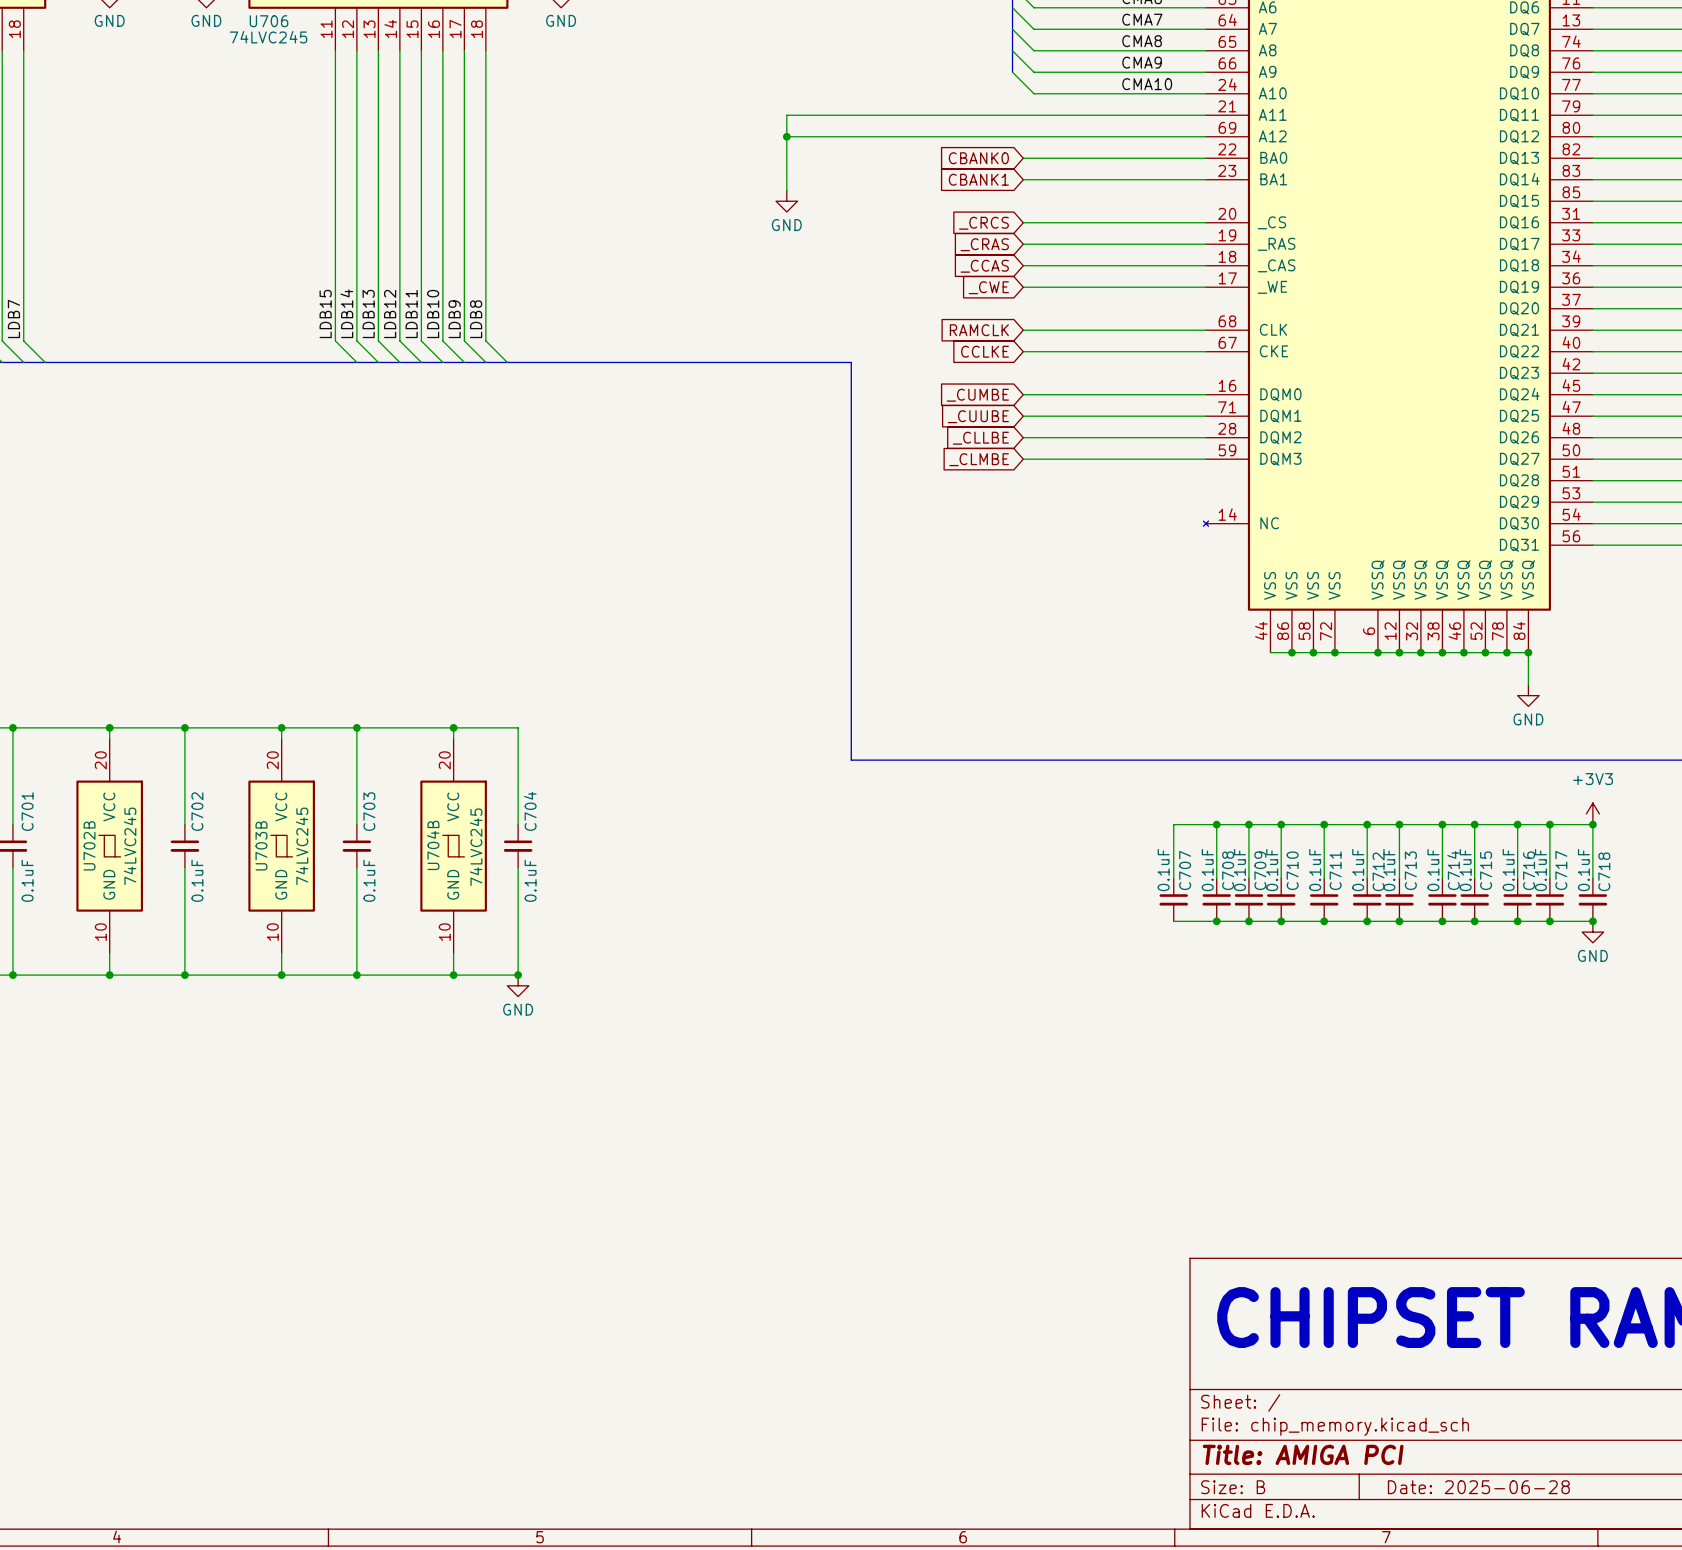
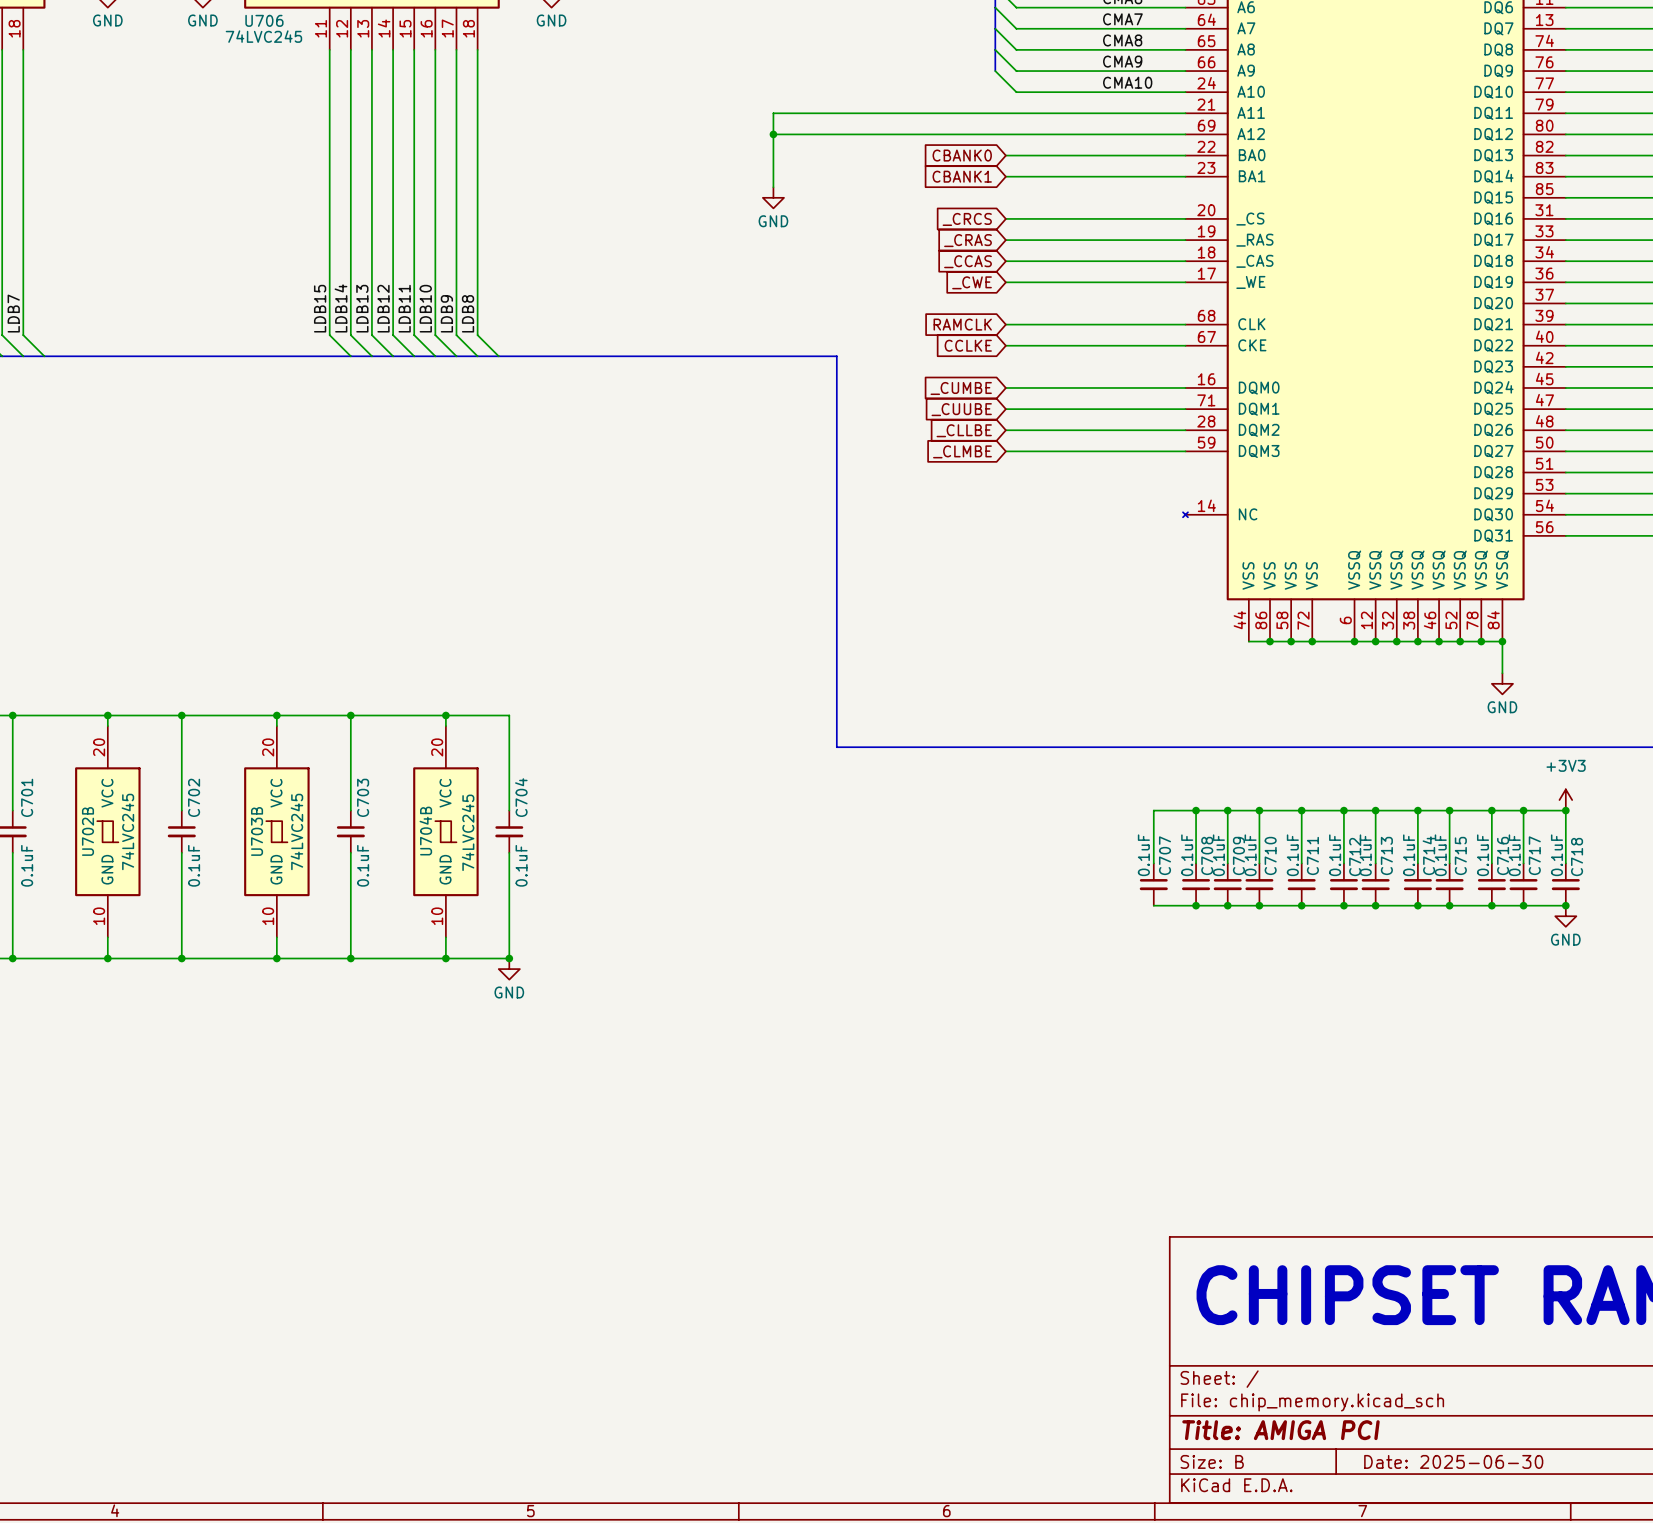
title block: Date: 2025-06-28 (1478, 1487) -> Date: 2025-06-30 (1453, 1461)

